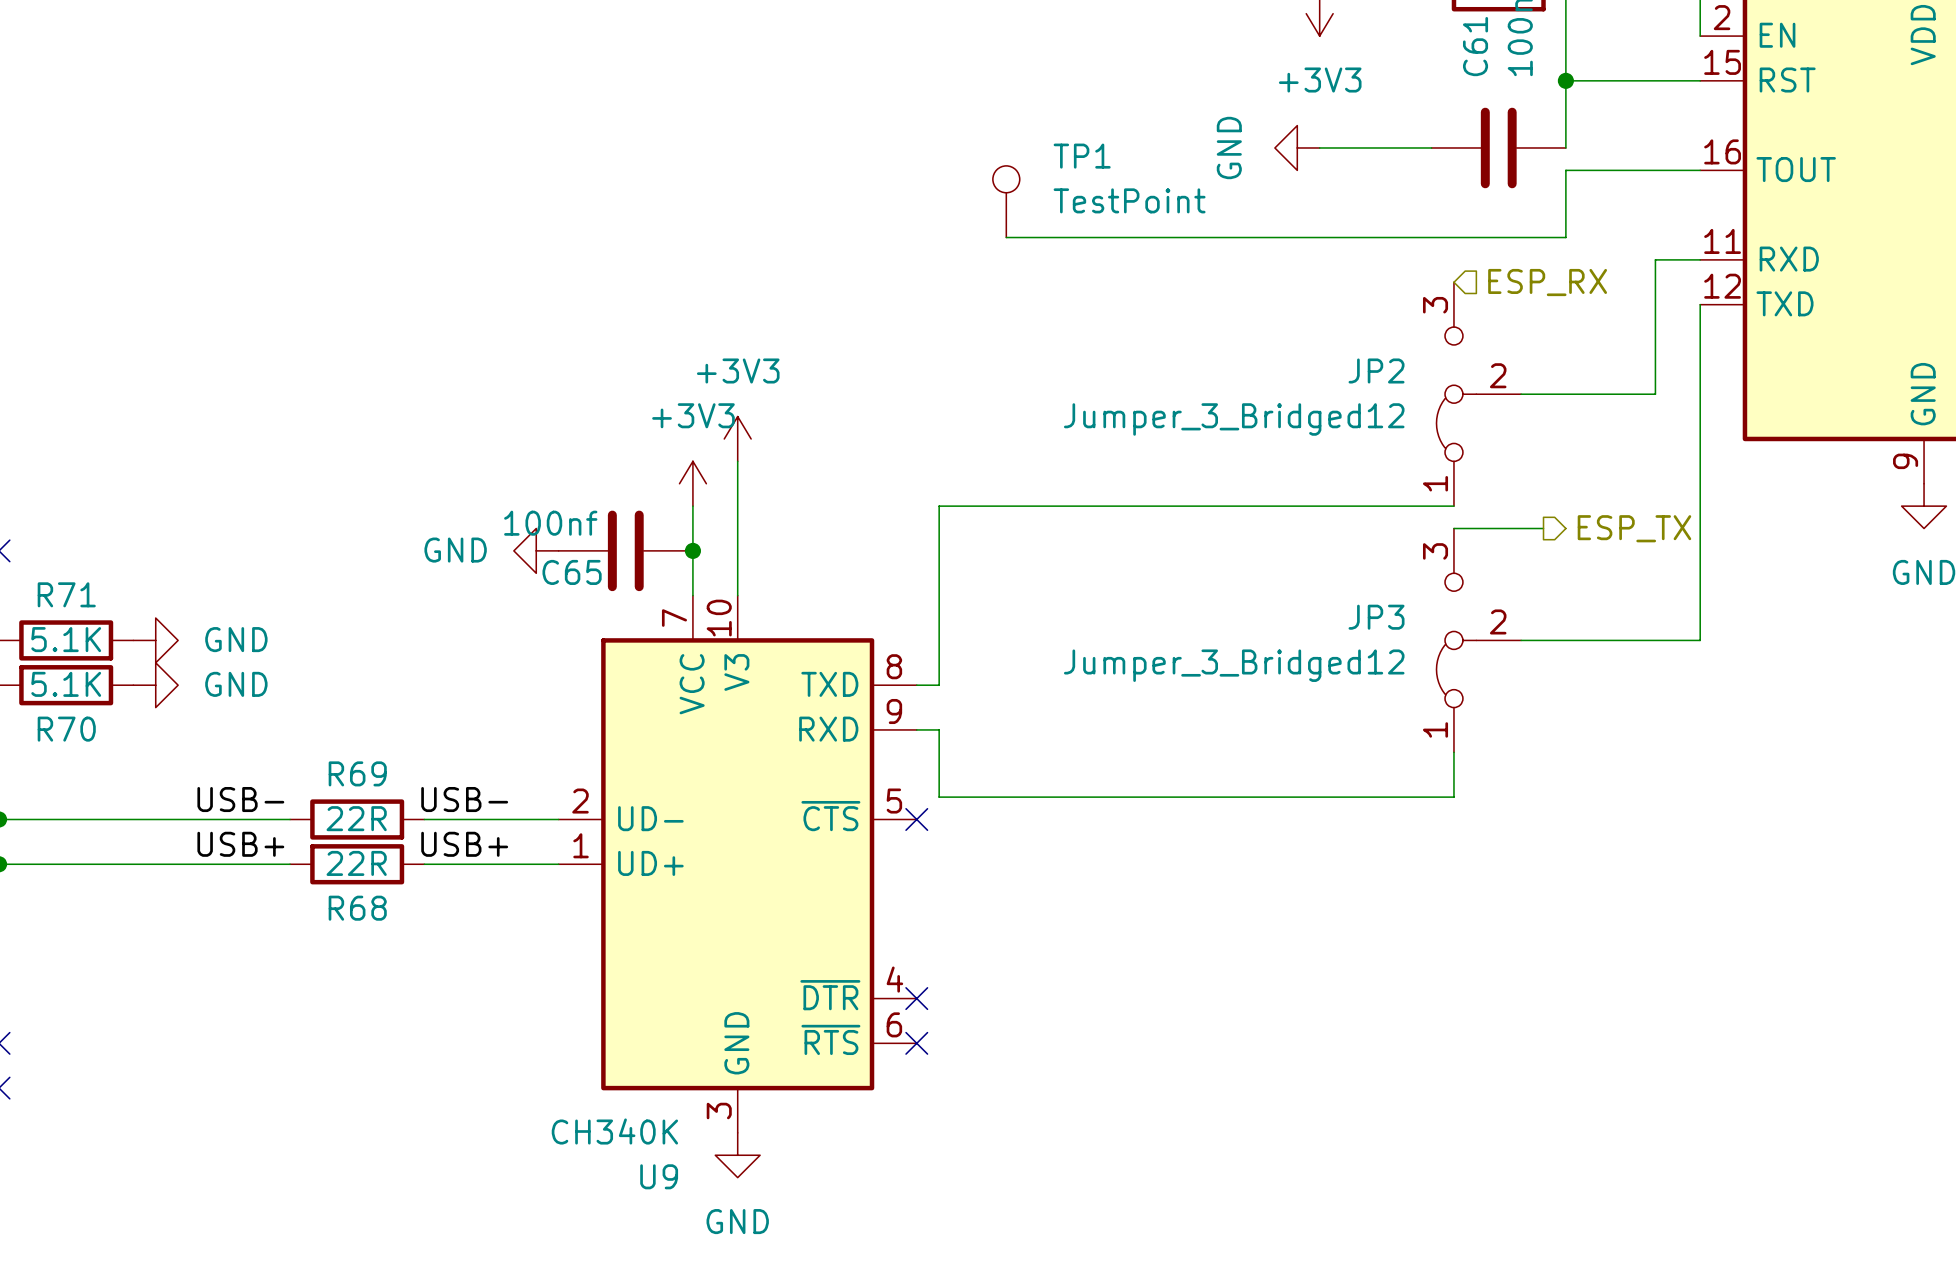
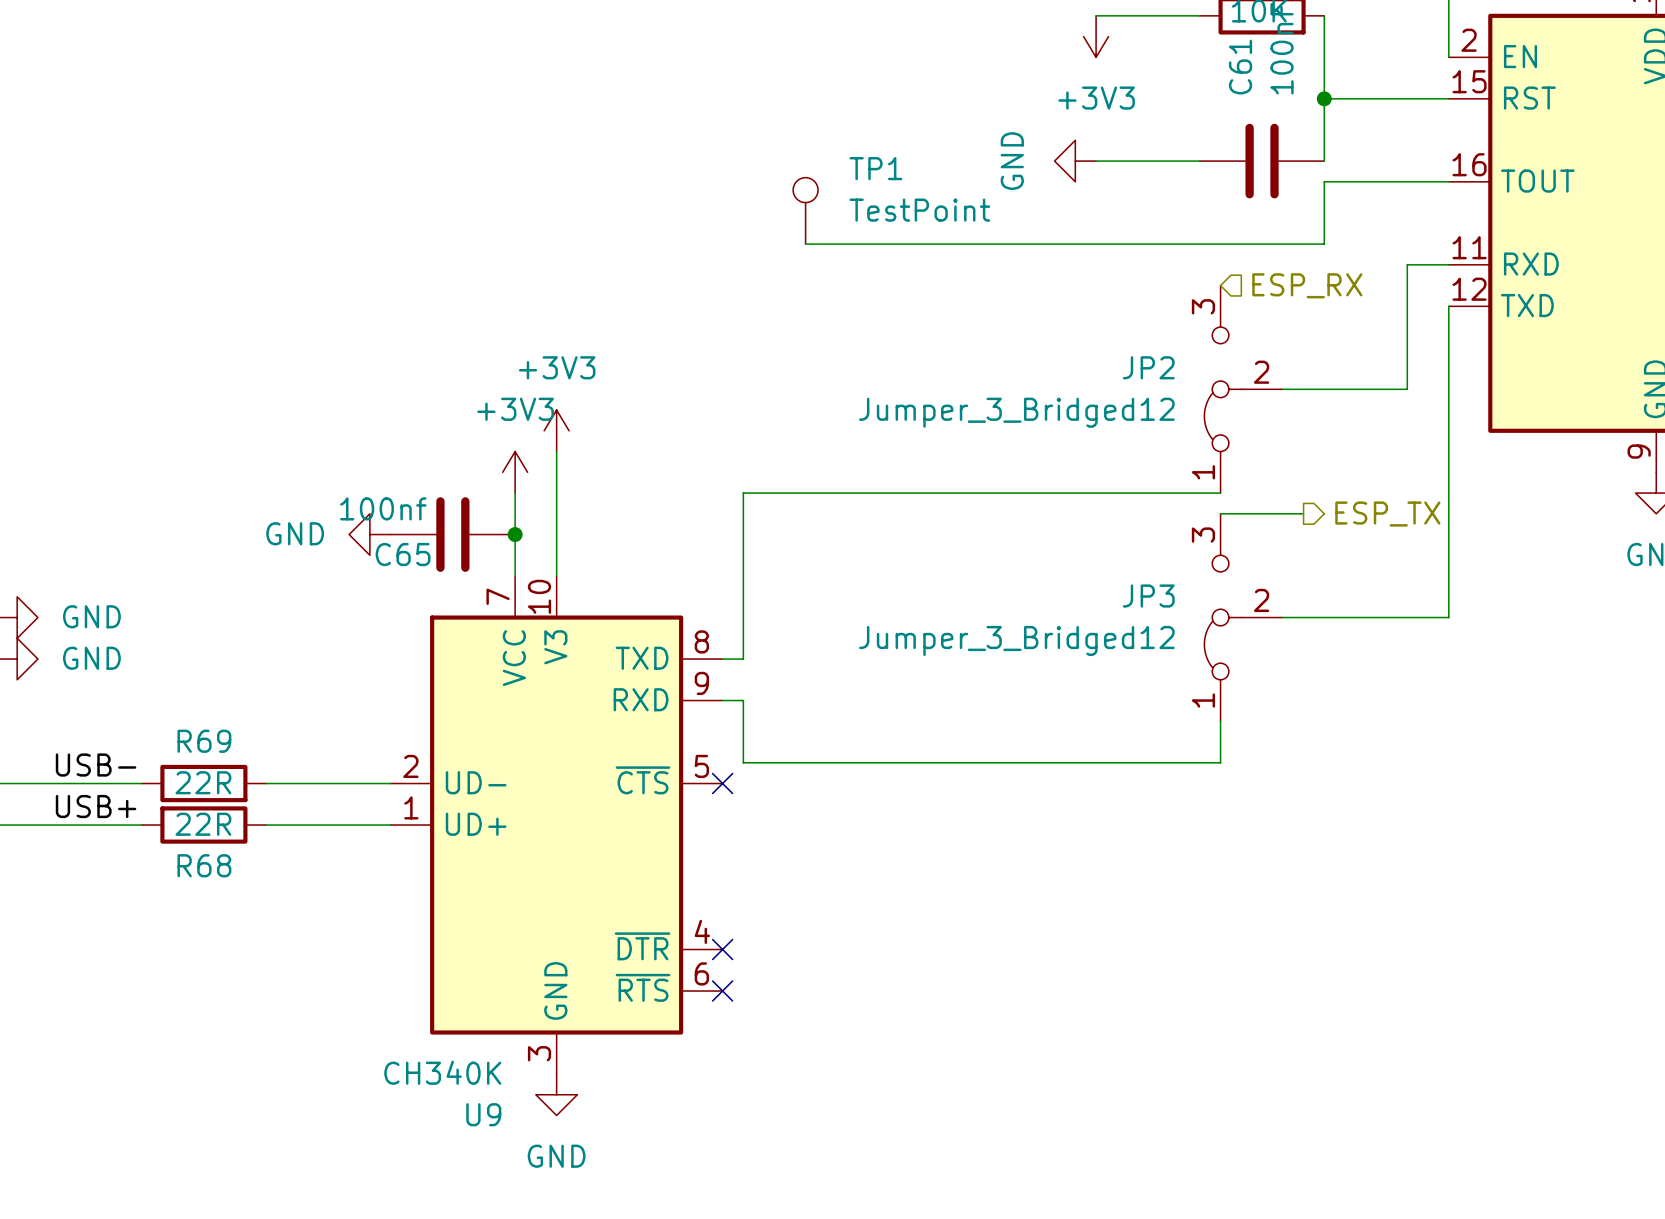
label: USB- (464, 799) -> none
label: USB+ (464, 844) -> none

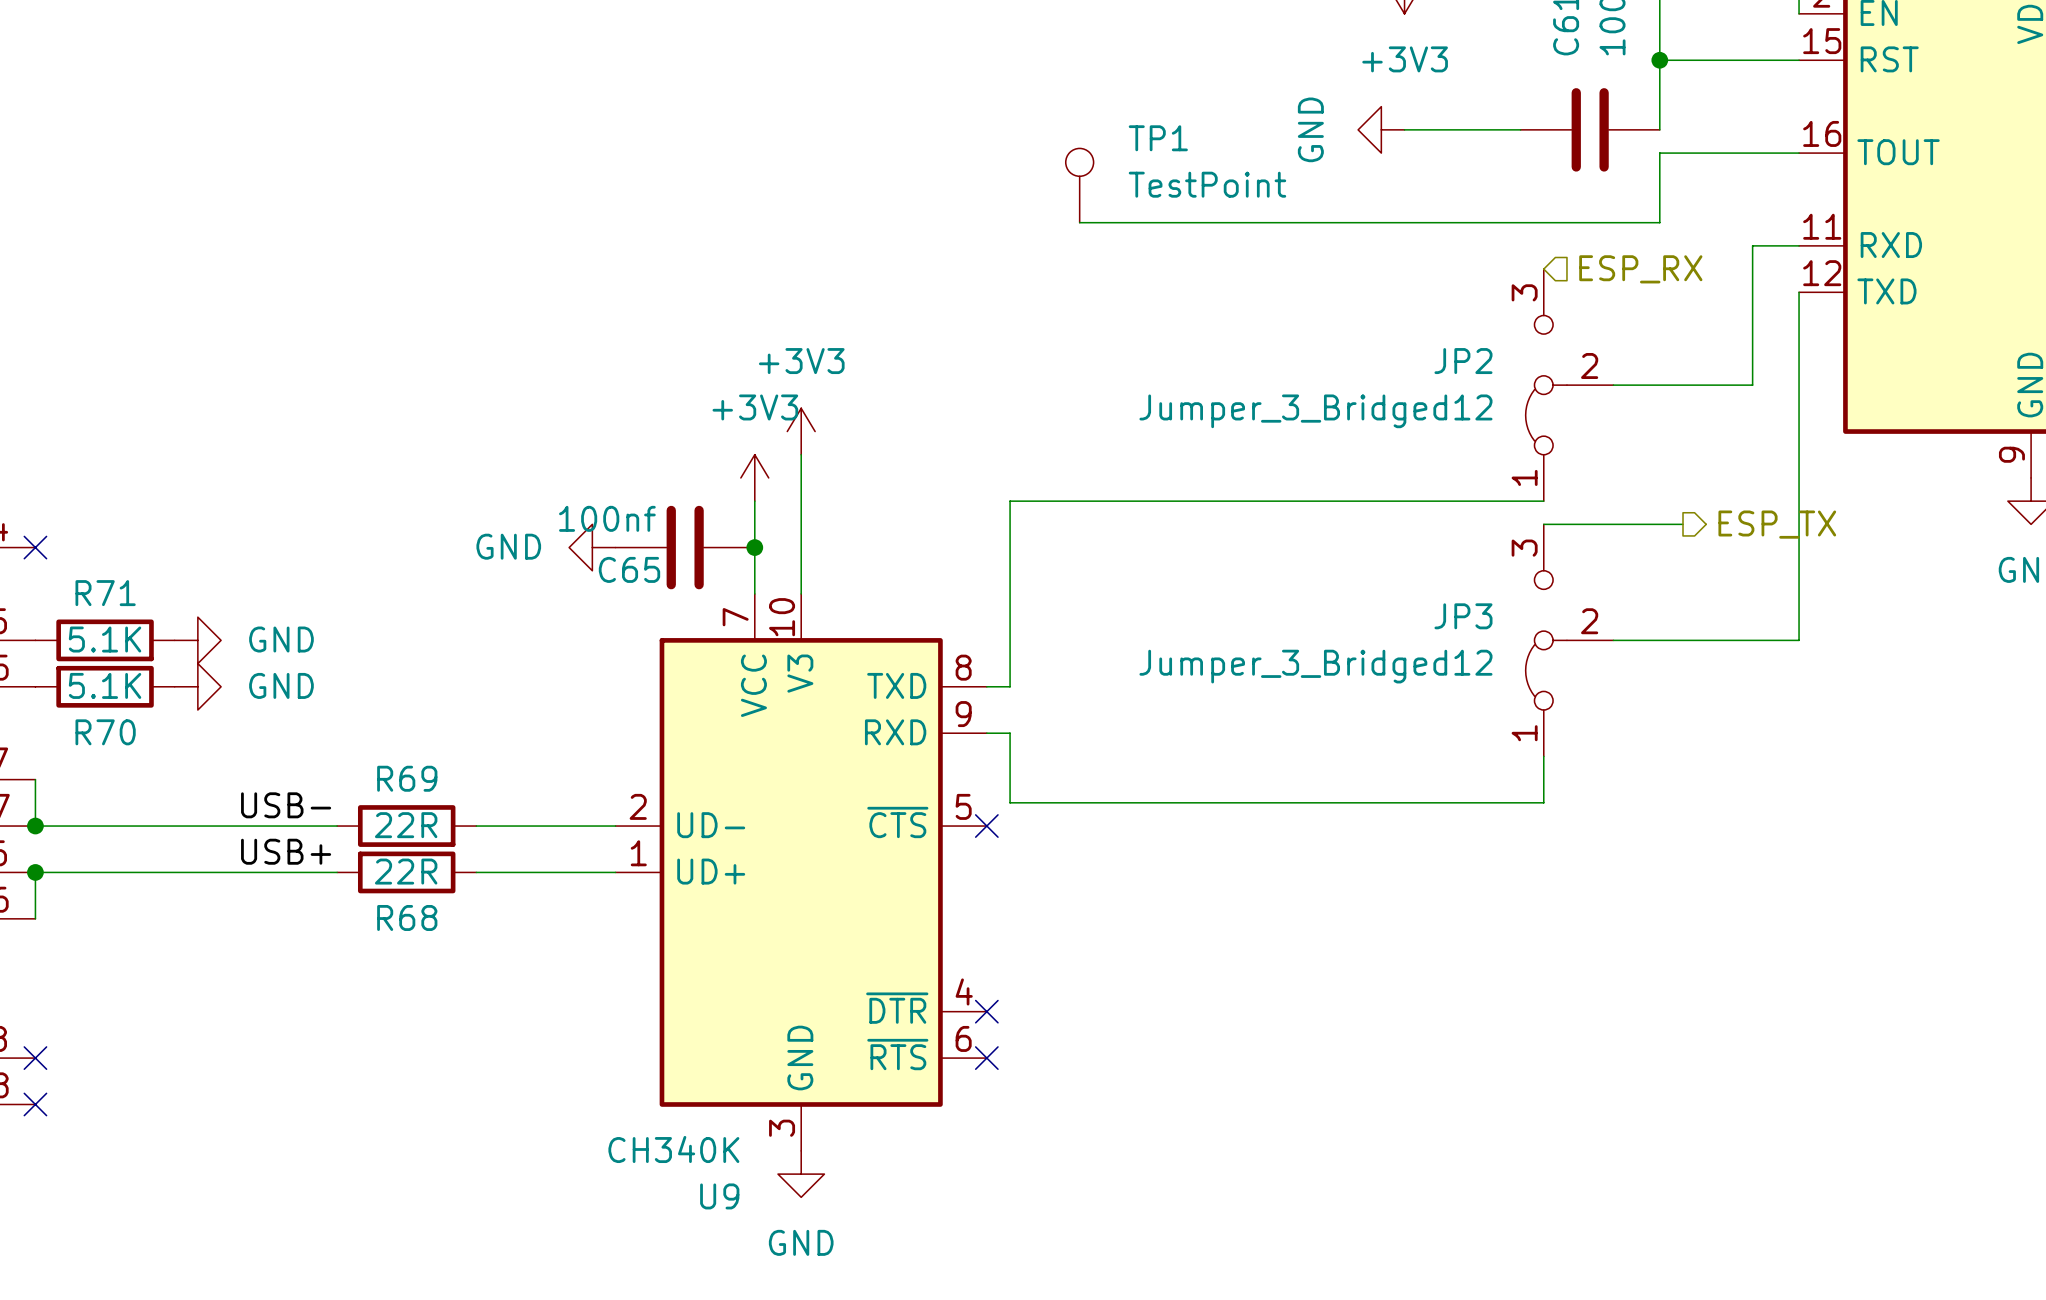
wire: none -> (1636, 524) (1683, 524)
hierarchical label position: ESP_TX (1387, 514) -> ESP_TX (1777, 524)

